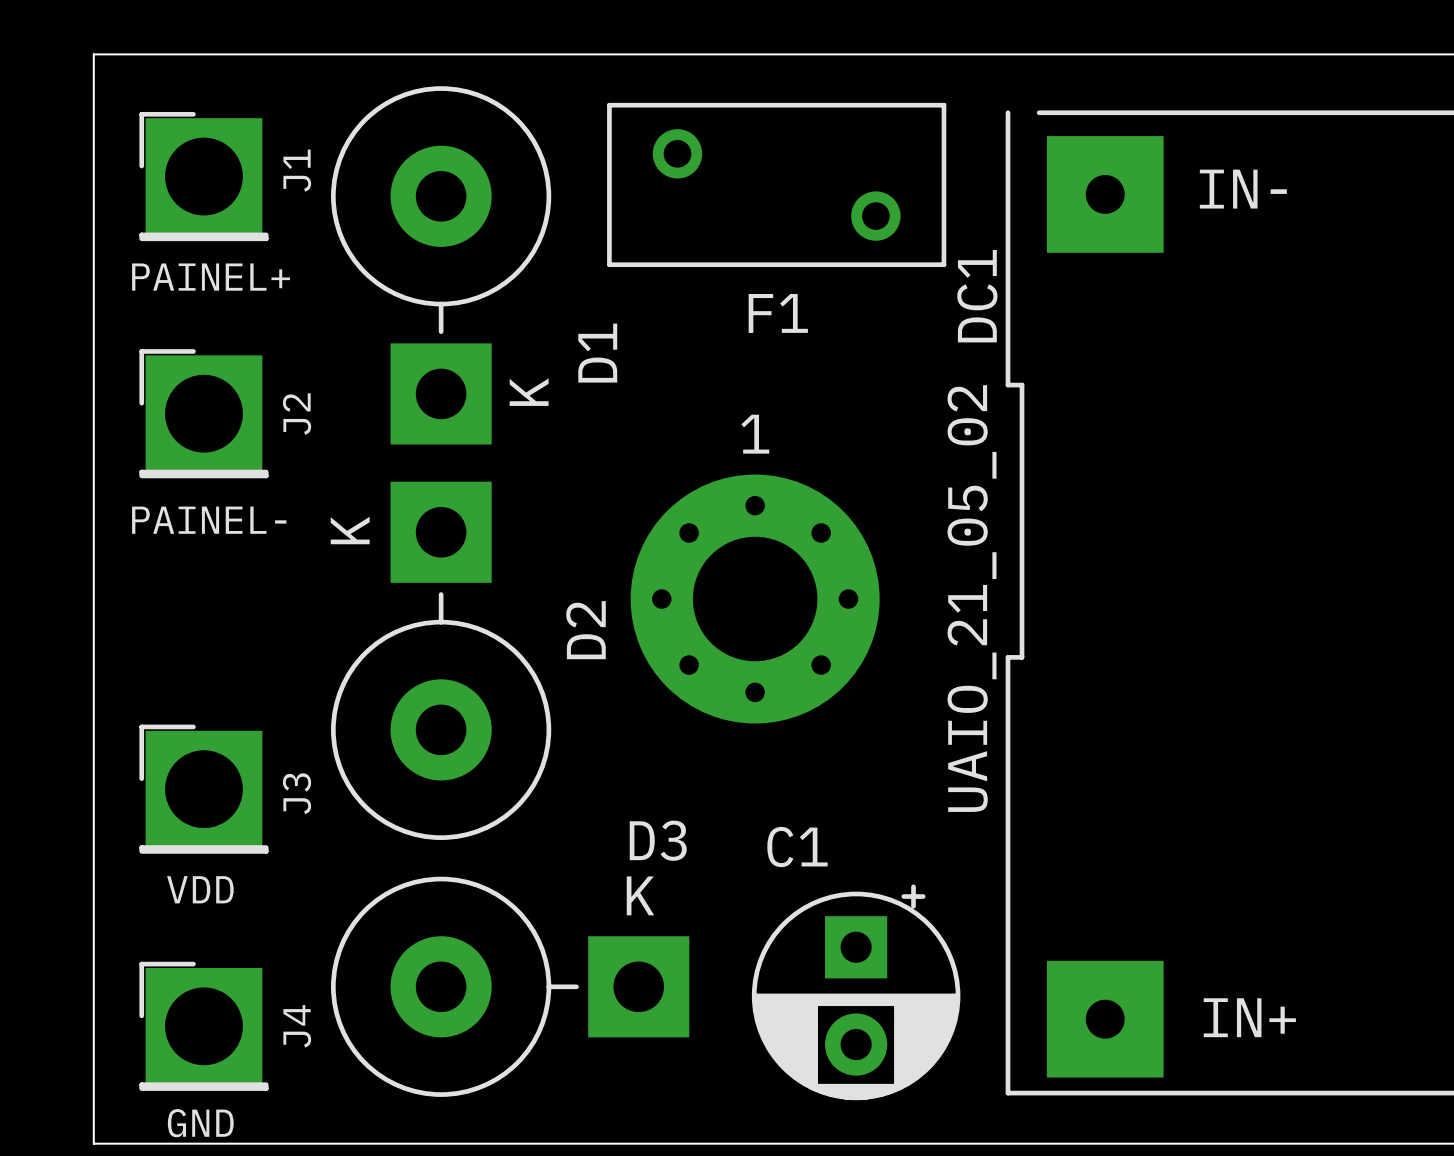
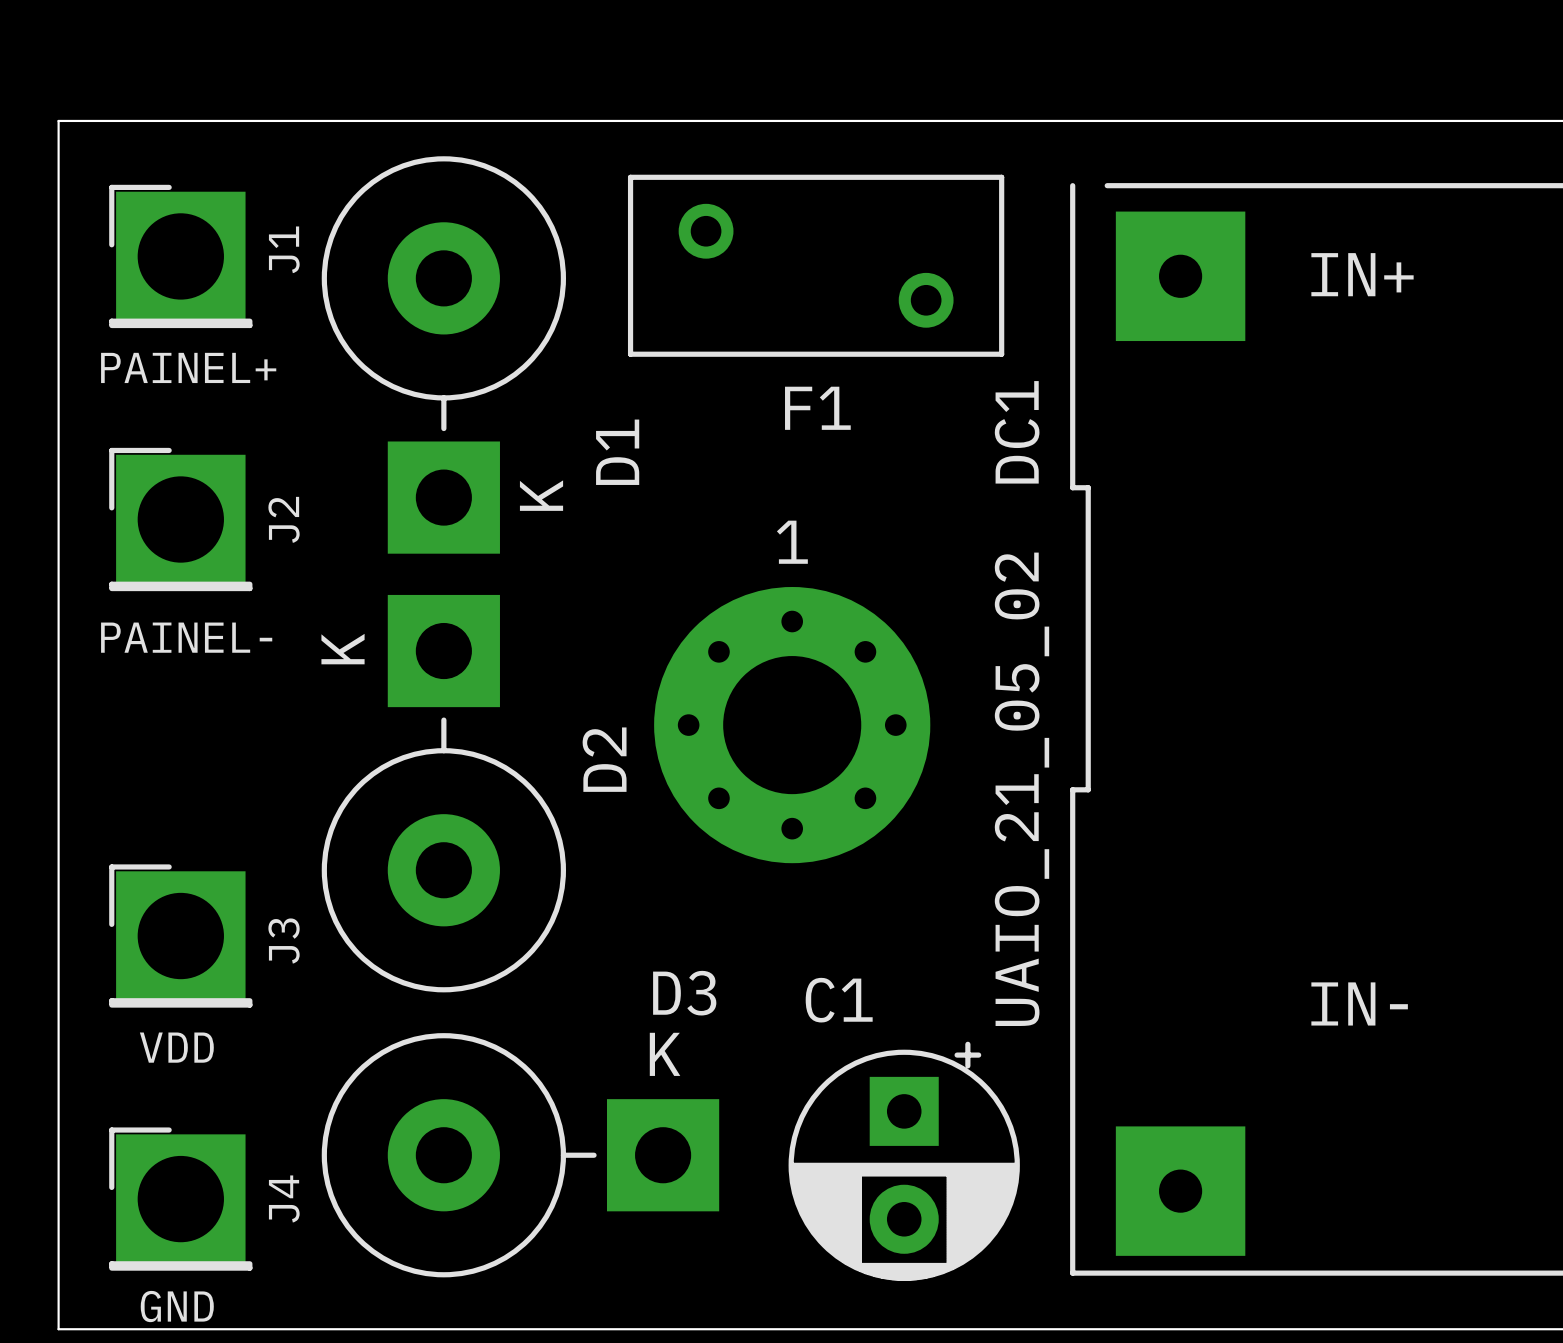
DC1 text position: IN- (1243, 189) -> IN- (1359, 1003)
DC1 name position: DC1 (977, 296) -> DC1 (1017, 432)
text position: UAIO_21_05_02 (972, 598) -> UAIO_21_05_02 (1022, 789)
DC1 text position: IN+ (1249, 1017) -> IN+ (1362, 274)

